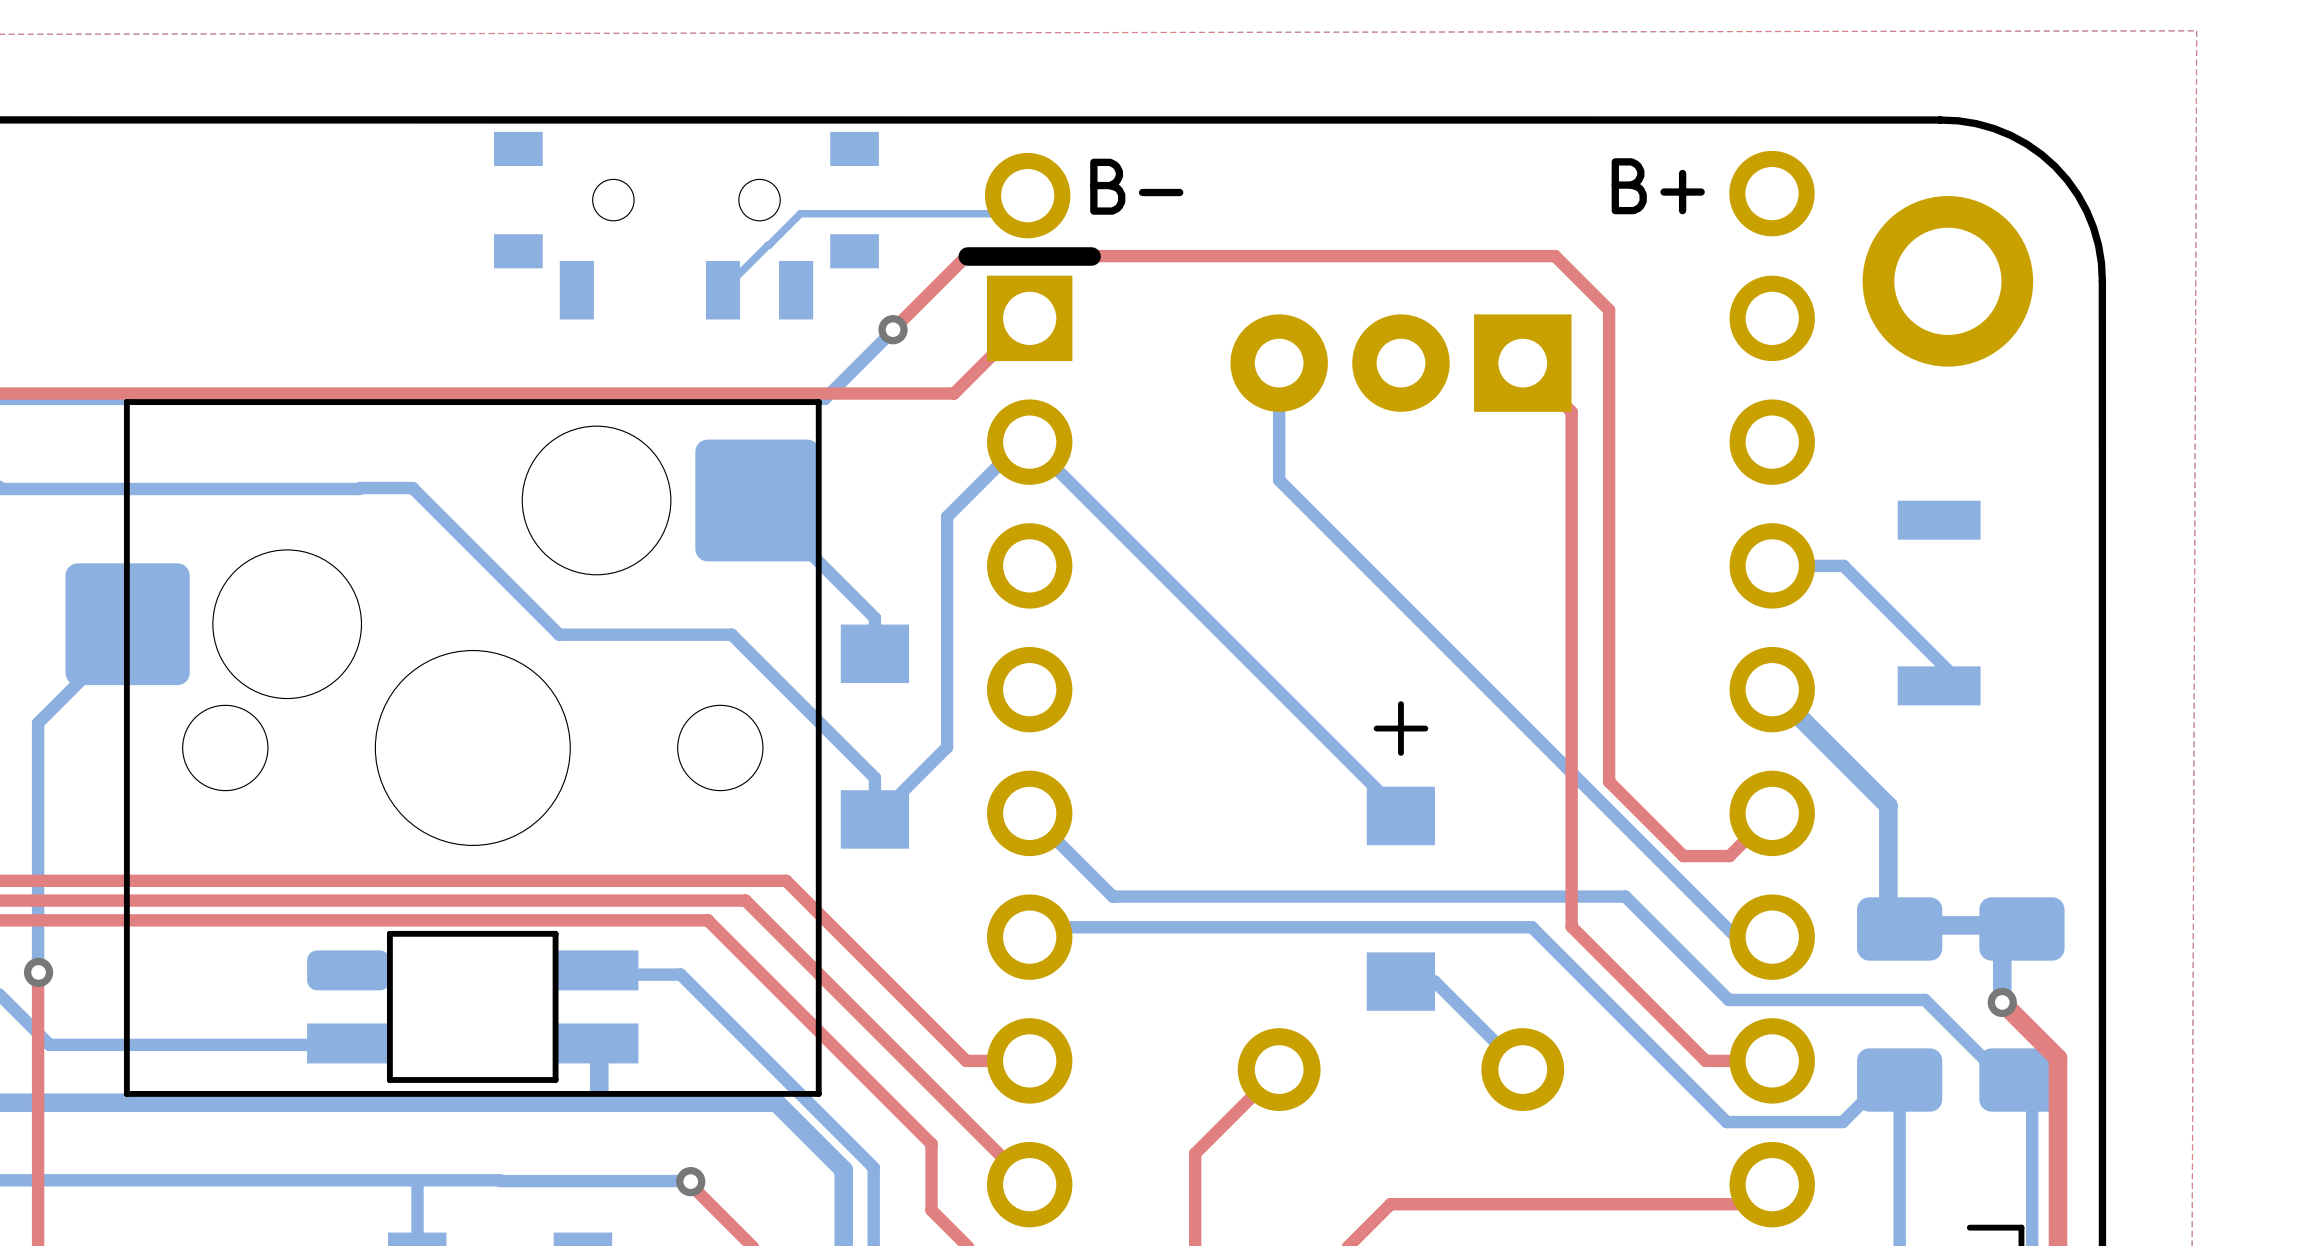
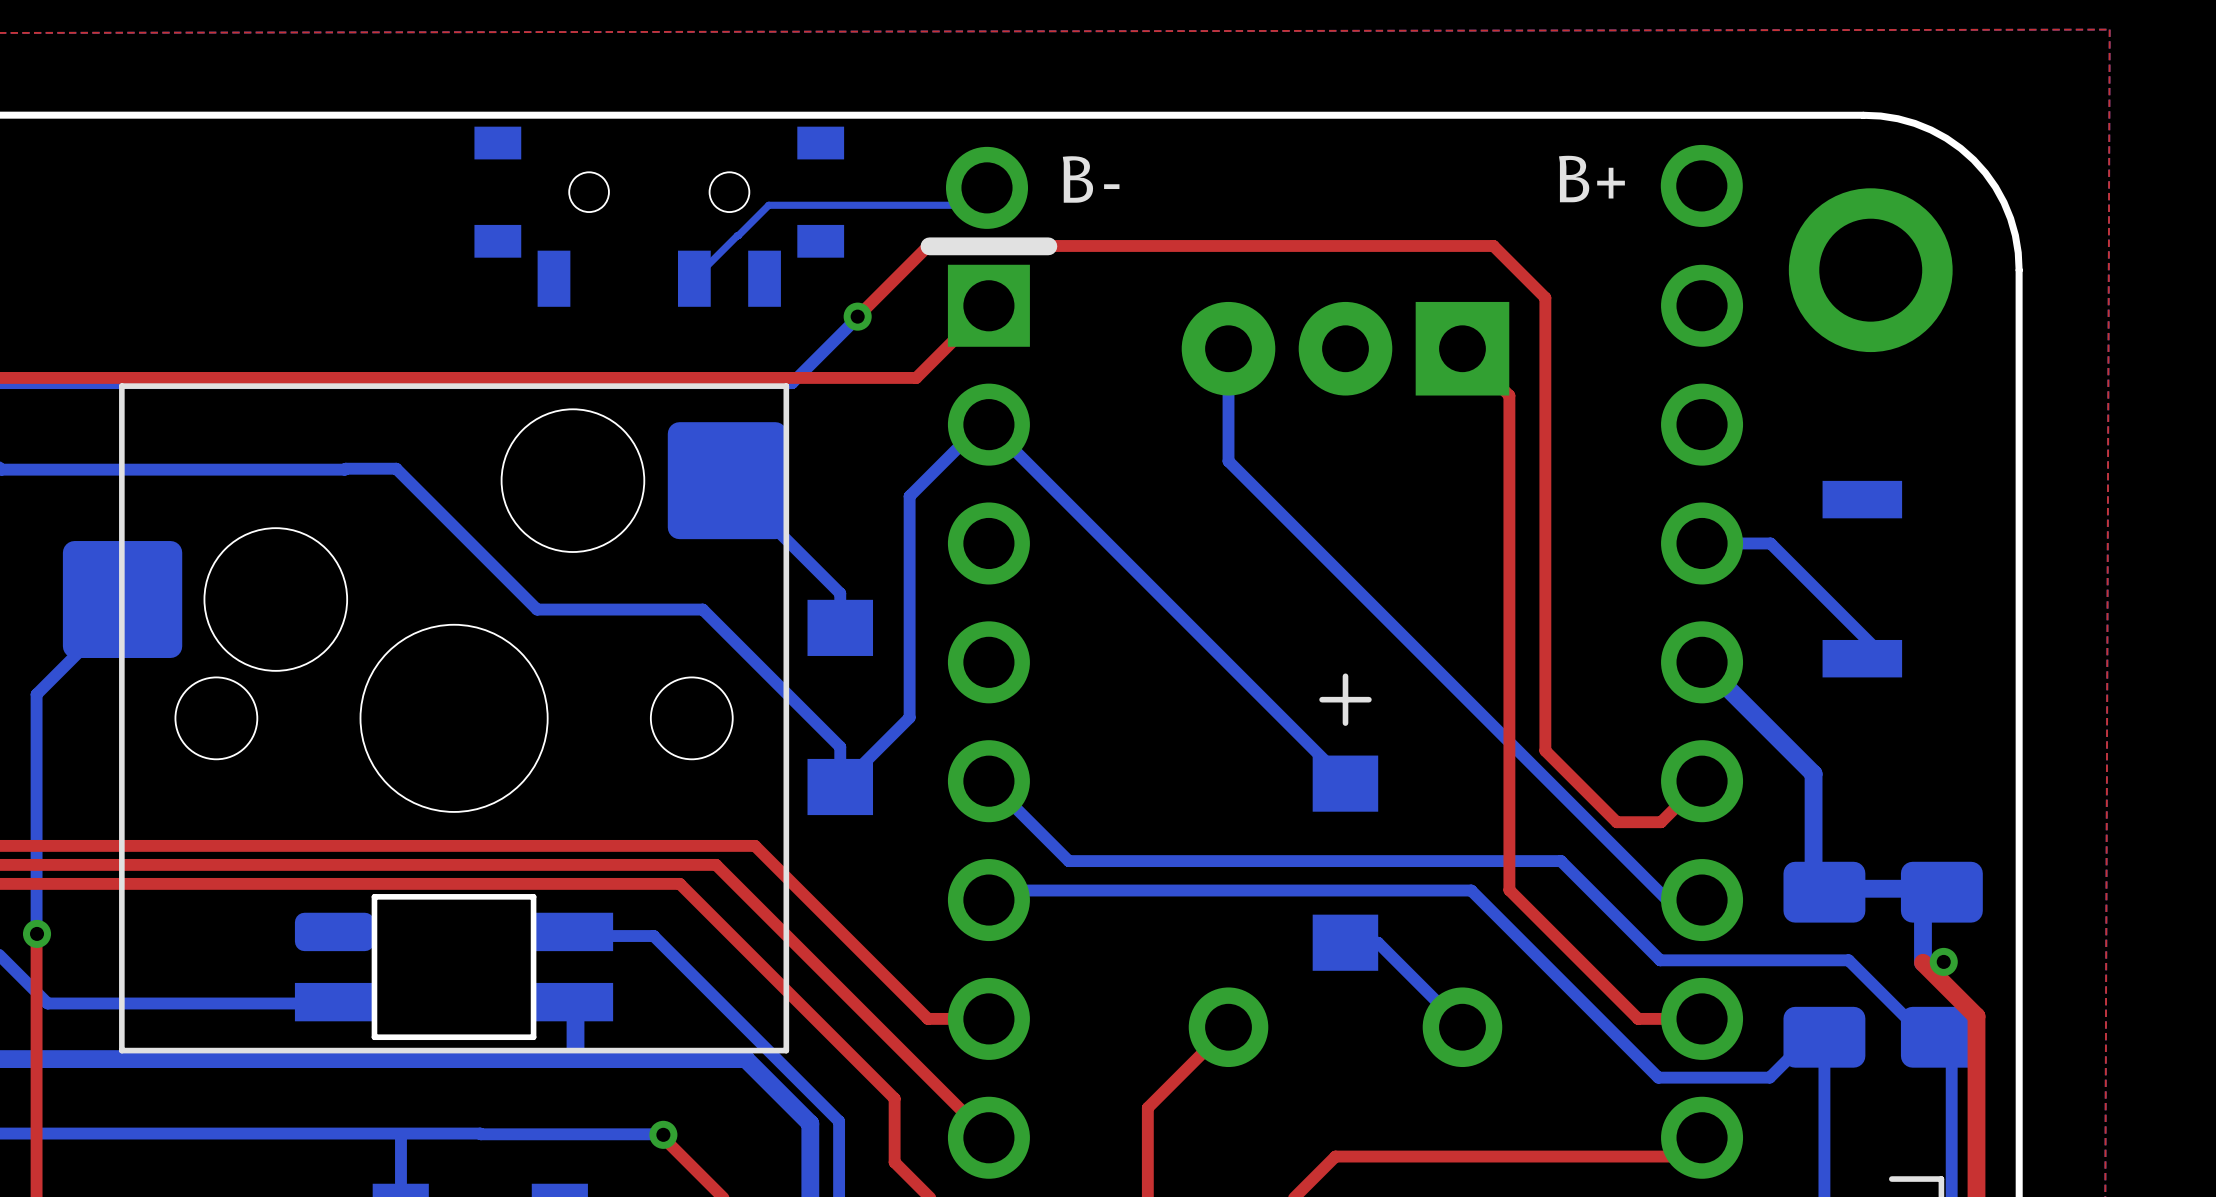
via position: (2002, 1002) -> (1943, 961)

